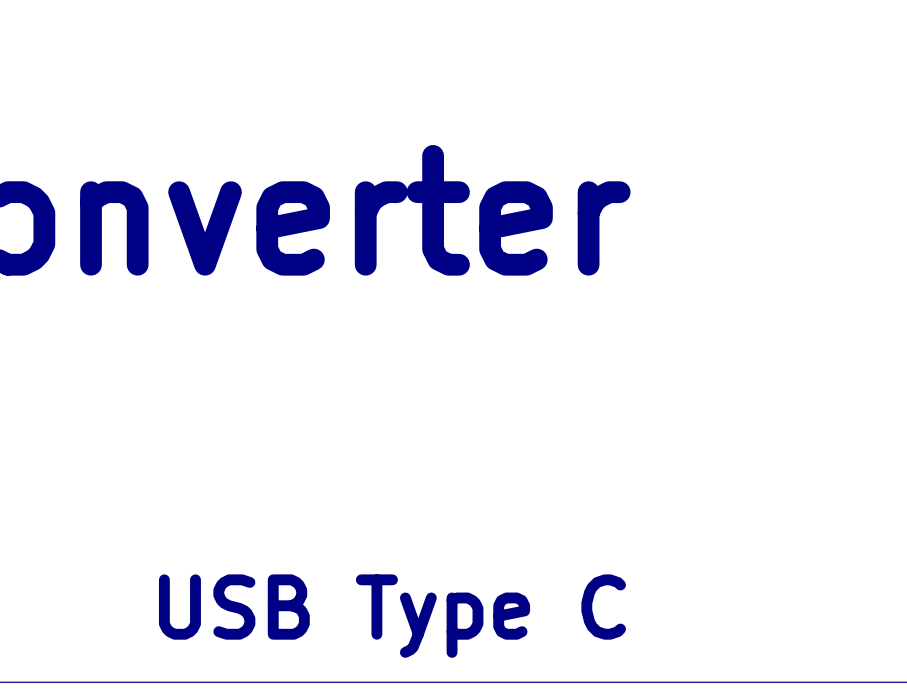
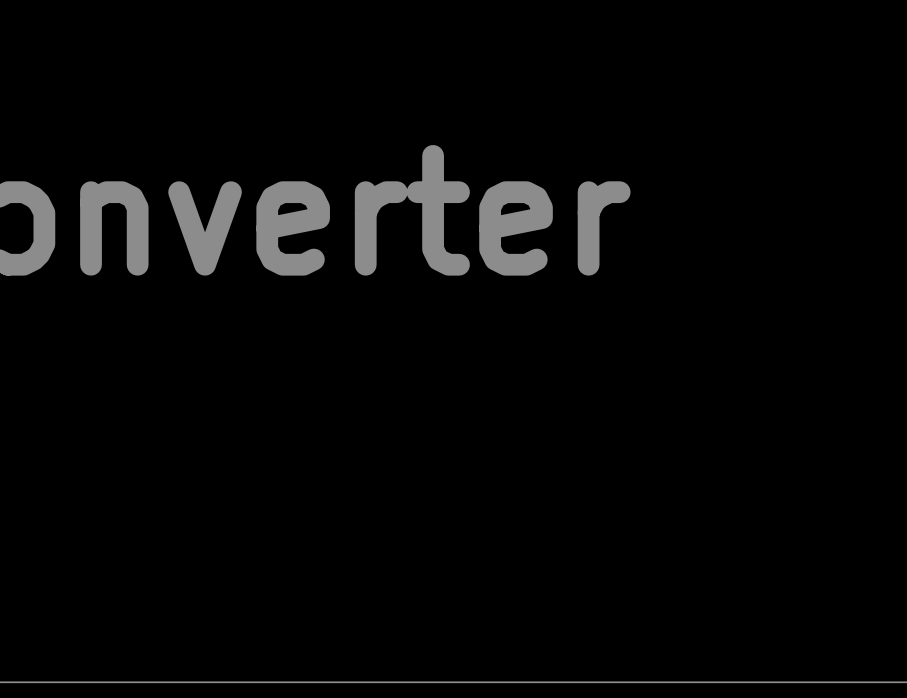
text: USB Type C (392, 616) -> none

